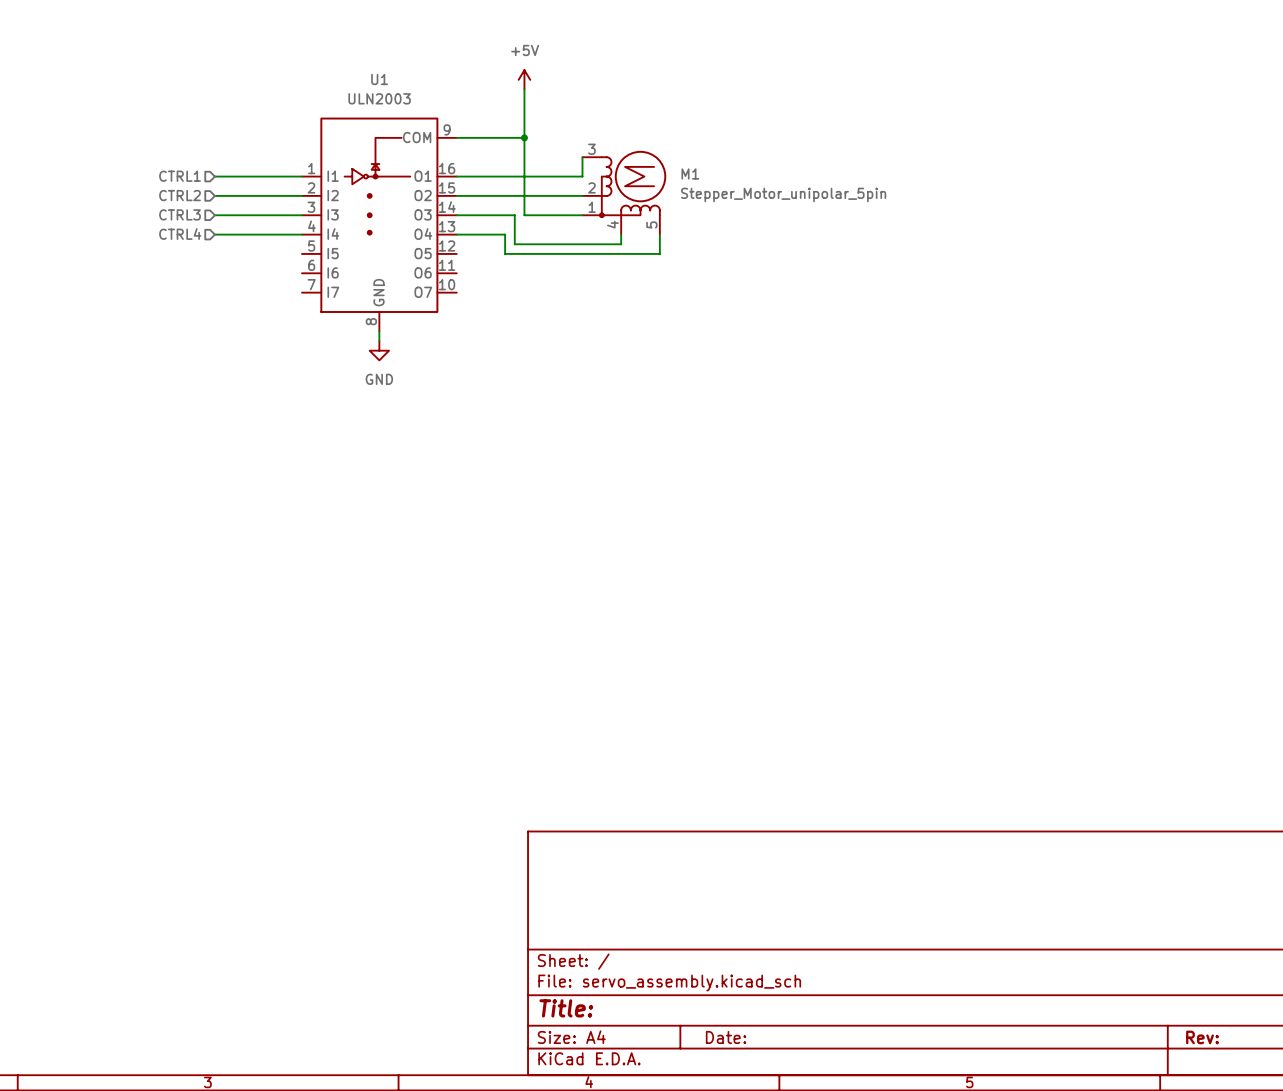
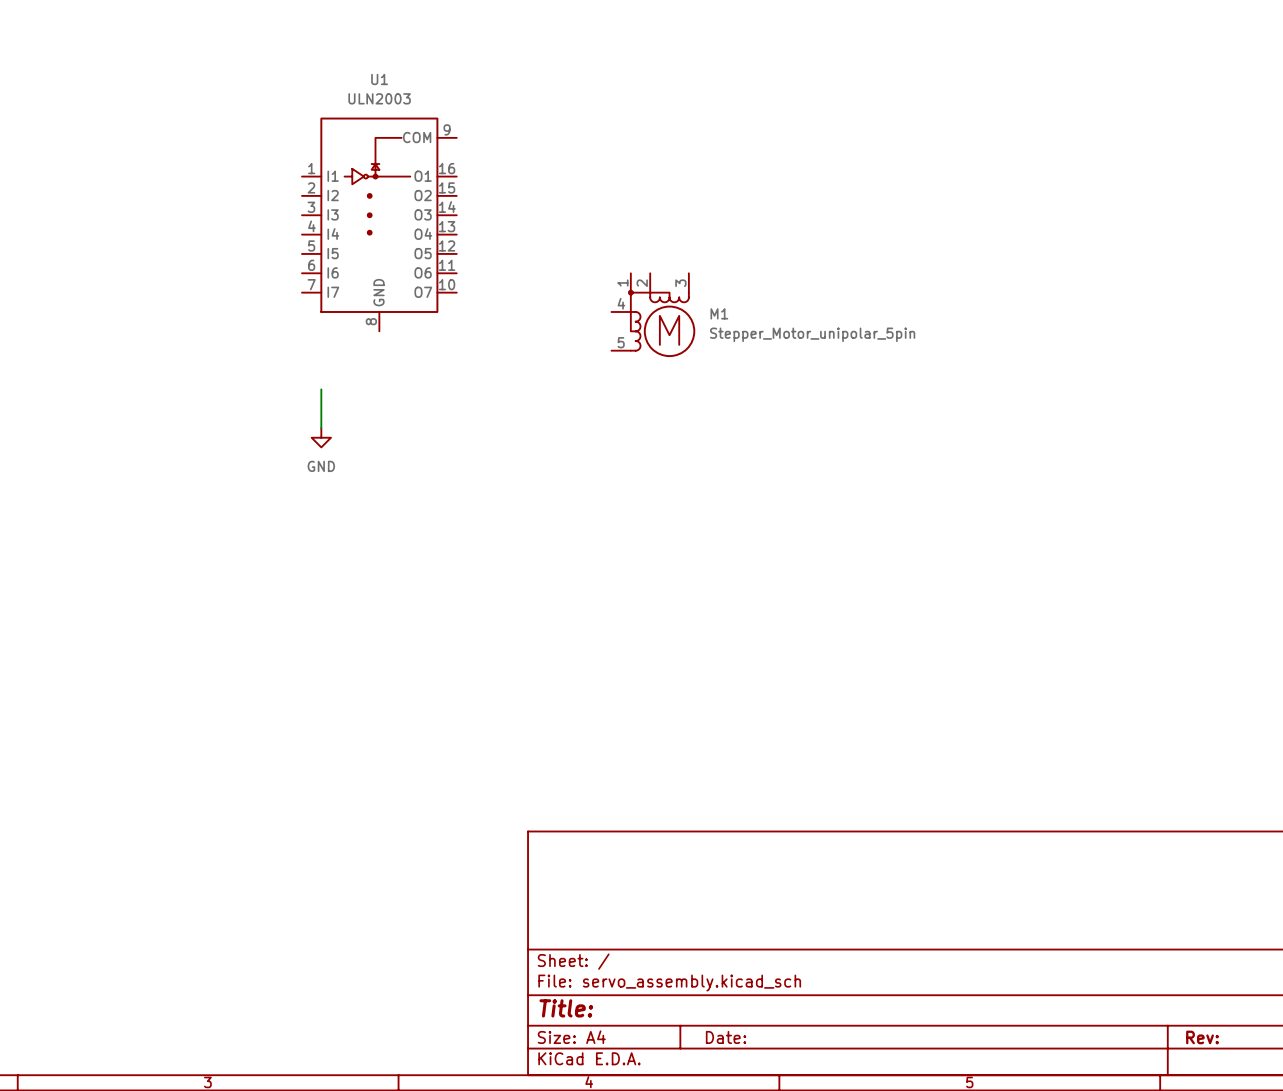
power symbol: +5V (524, 79) -> none
wire: (524, 89) (524, 215) (582, 215) -> none
wire: (456, 137) (524, 137) -> none
junction: (524, 137) -> none
wire: (582, 157) (582, 176) (456, 176) -> none
M1 name position: M1 (690, 173) -> M1 (719, 313)
hierarchical label: CTRL1 (180, 176) -> none
wire: (214, 176) (301, 176) -> none
M1 rotation: 0° (633, 184) -> 90° clockwise (662, 323)
M1 position: (624, 192) -> (653, 315)
M1 value position: Stepper_Motor_unipolar_5pin (783, 194) -> Stepper_Motor_unipolar_5pin (812, 334)
hierarchical label: CTRL2 (180, 195) -> none
wire: (214, 195) (301, 195) -> none
wire: (456, 195) (582, 195) -> none
hierarchical label: CTRL3 (180, 214) -> none
wire: (214, 215) (301, 215) -> none
wire: (456, 215) (514, 215) (514, 244) (621, 244) (621, 234) -> none
hierarchical label: CTRL4 (180, 234) -> none
wire: (214, 234) (301, 234) -> none
wire: (456, 234) (505, 234) (505, 253) (659, 253) (659, 234) -> none
wire: (379, 331) (379, 341) -> none
power symbol position: GND (379, 350) -> GND (321, 437)
wire: none -> (321, 389) (321, 428)

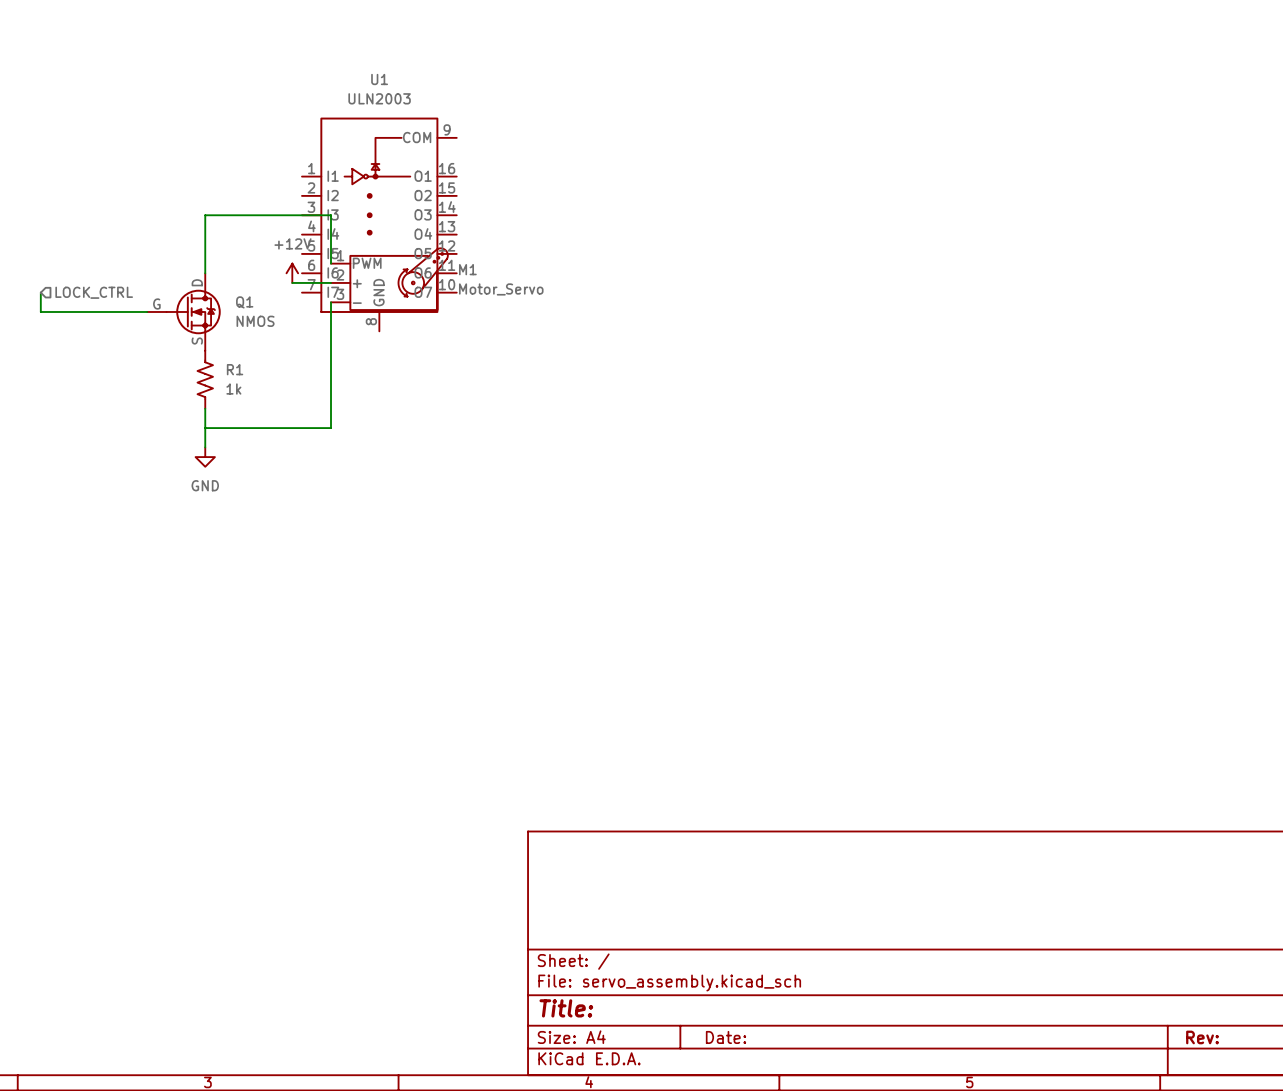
wire: none -> (331, 263) (331, 215) (205, 215) (205, 273)
power symbol: none -> +12V (292, 273)
M1 symbol: [611, 273, 696, 358] -> [331, 248, 448, 312]
wire: none -> (292, 282) (331, 282)
wire: none -> (40, 292) (40, 311) (147, 311)
hierarchical label: none -> LOCK_CTRL (94, 292)
wire: none -> (331, 302) (331, 428) (205, 428)
Q1: none -> NMOS (183, 311)
M1 value: Stepper_Motor_unipolar_5pin (812, 334) -> Motor_Servo (501, 289)
R1: none -> 1k (205, 379)
wire: (321, 389) (321, 428) -> (205, 408) (205, 447)
power symbol position: GND (321, 437) -> GND (205, 457)

